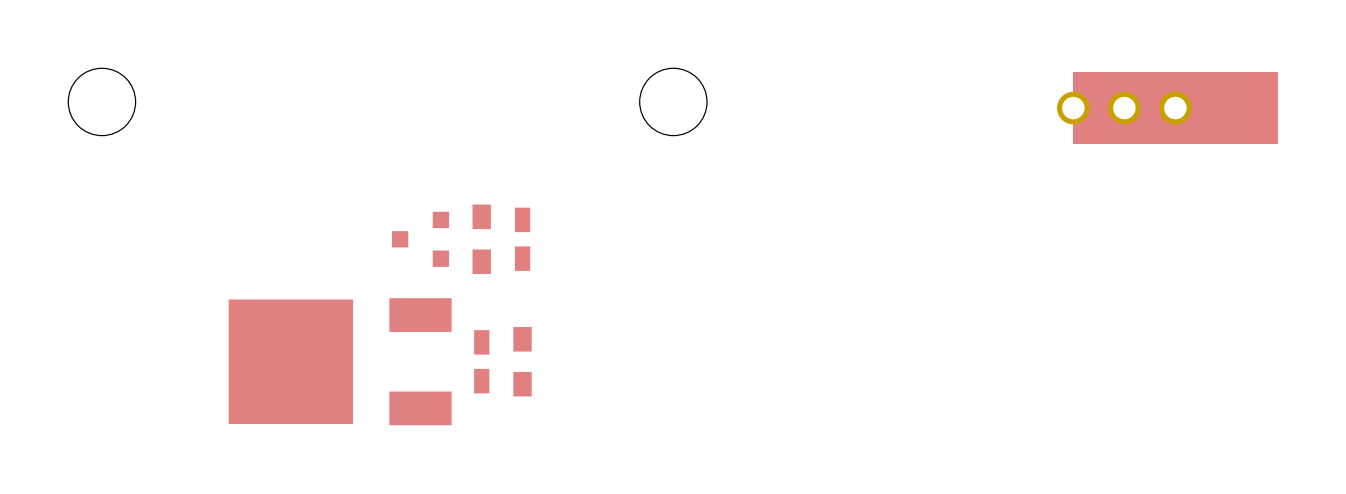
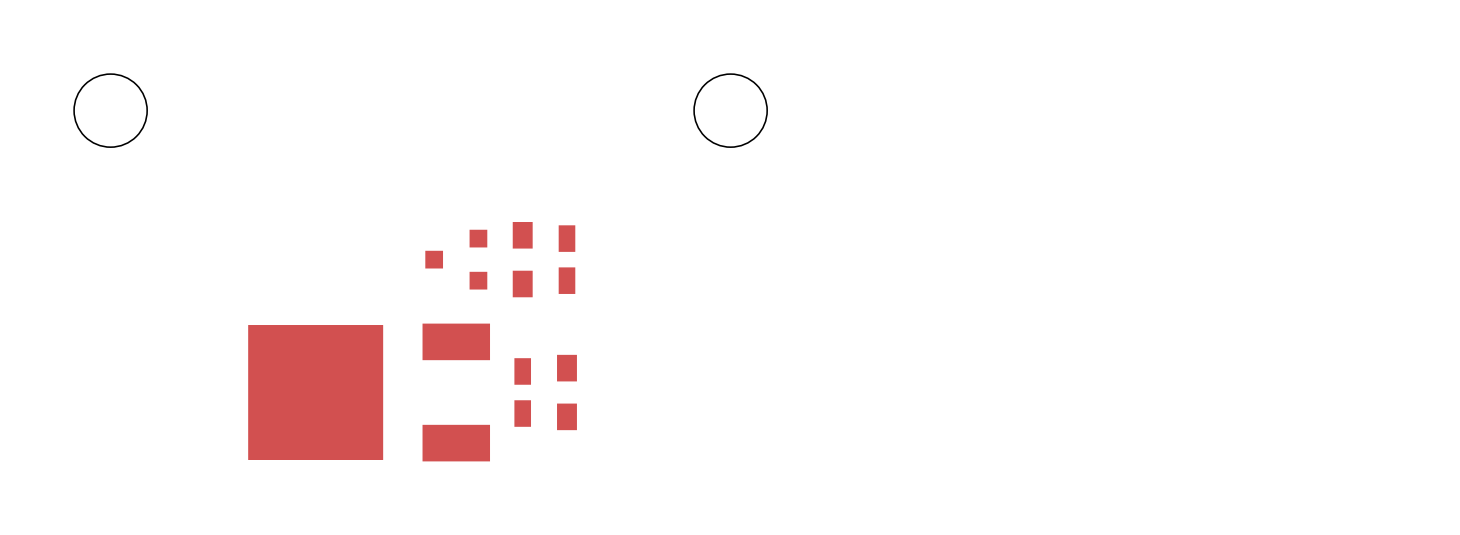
part: (1124, 108) -> none
part: (1175, 108) -> none

